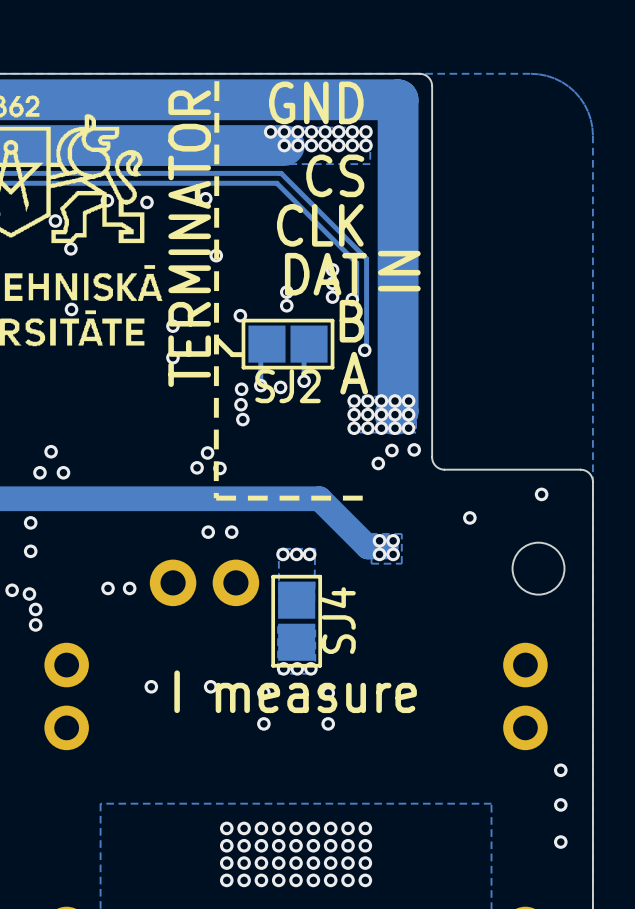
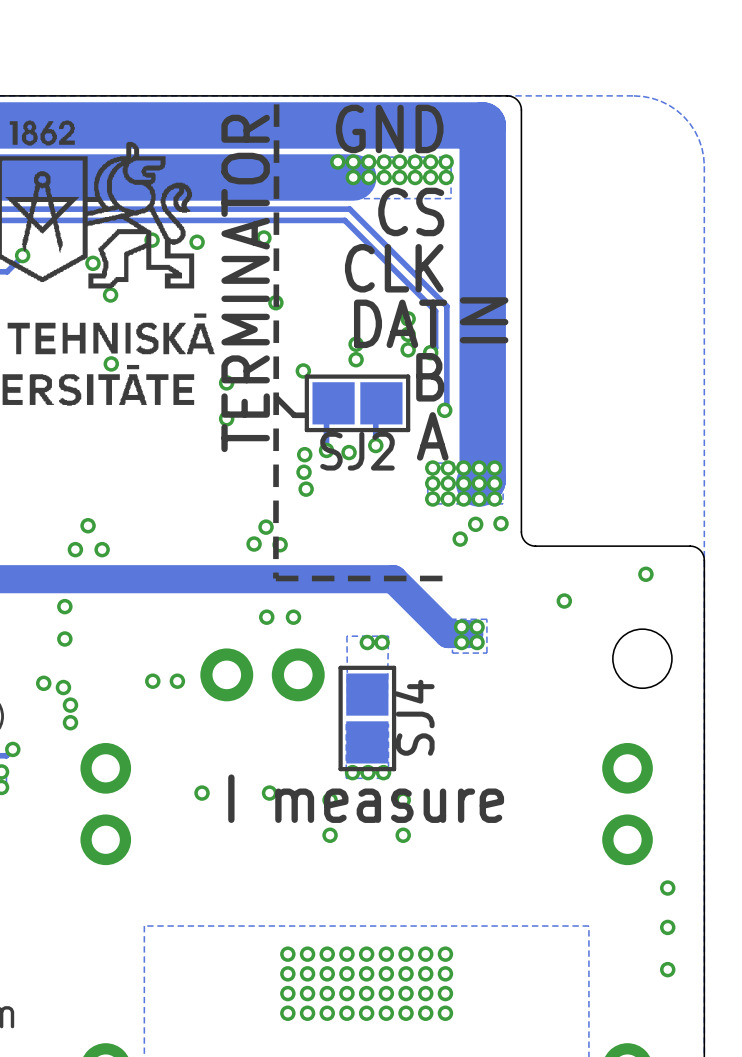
via: (283, 554) -> none

